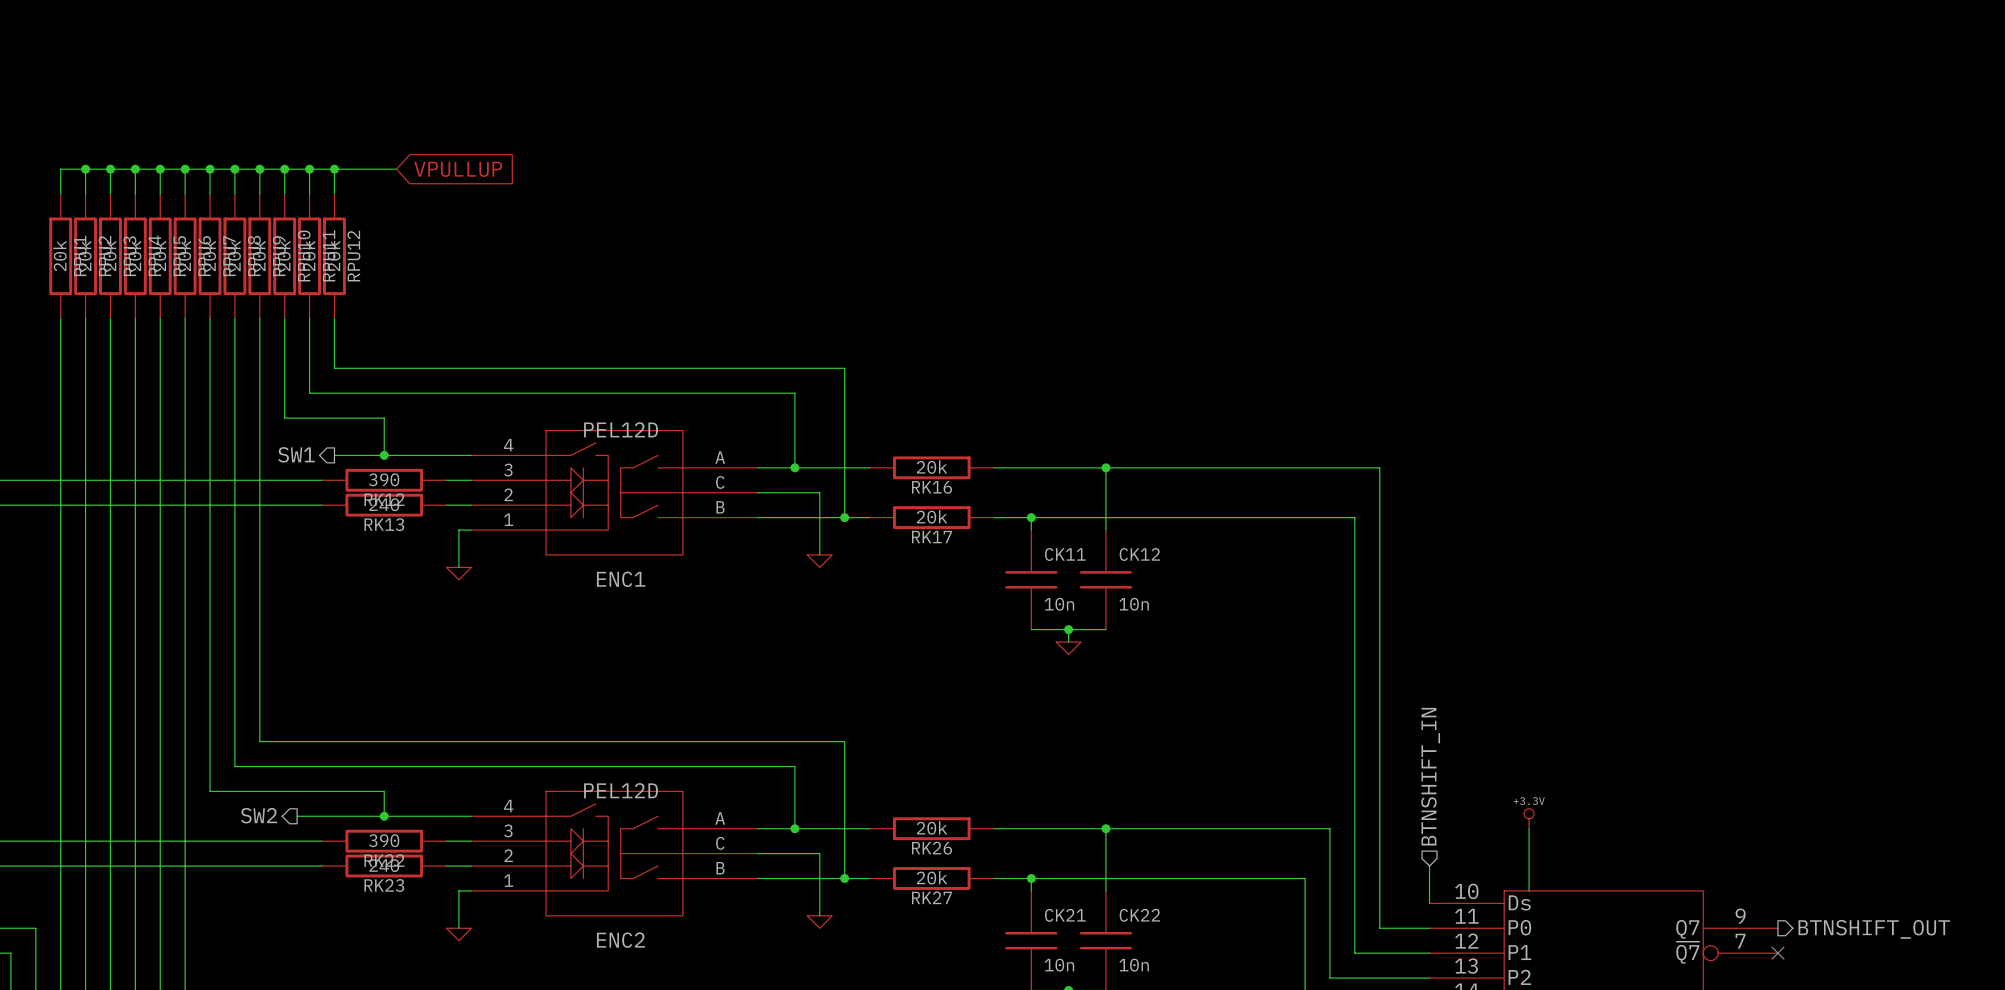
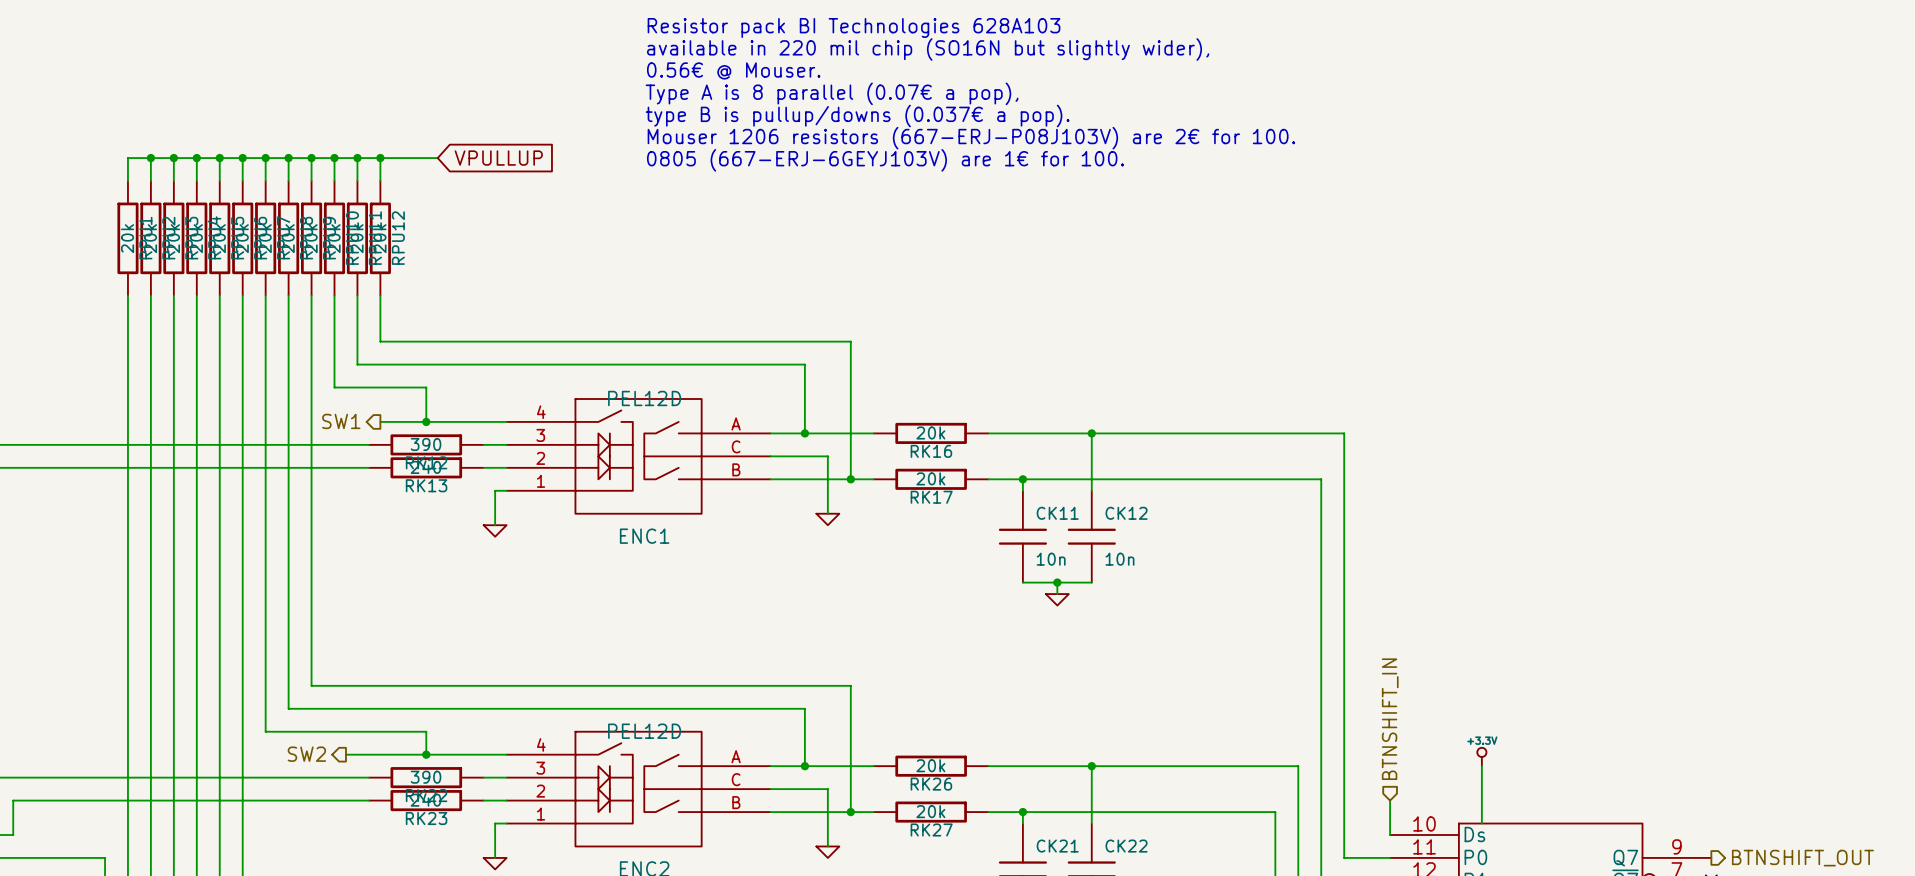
text: none -> Resistor pack BI Technologies 628A103 (854, 27)
text: none -> available in 220 mil chip (SO16N but slightly wider), (928, 49)
text: none -> 0.56€ @ Mouser. (733, 71)
text: none -> Type A is 8 parallel (0.07€ a pop), (832, 93)
text: none -> type B is pullup/downs (0.037€ a pop). (857, 116)
text: none -> Mouser 1206 resistors (667-ERJ-P08J103V) are 2€ for 100. (971, 138)
text: none -> 0805 (667-ERJ-6GEYJ103V) are 1€ for 100. (885, 160)

